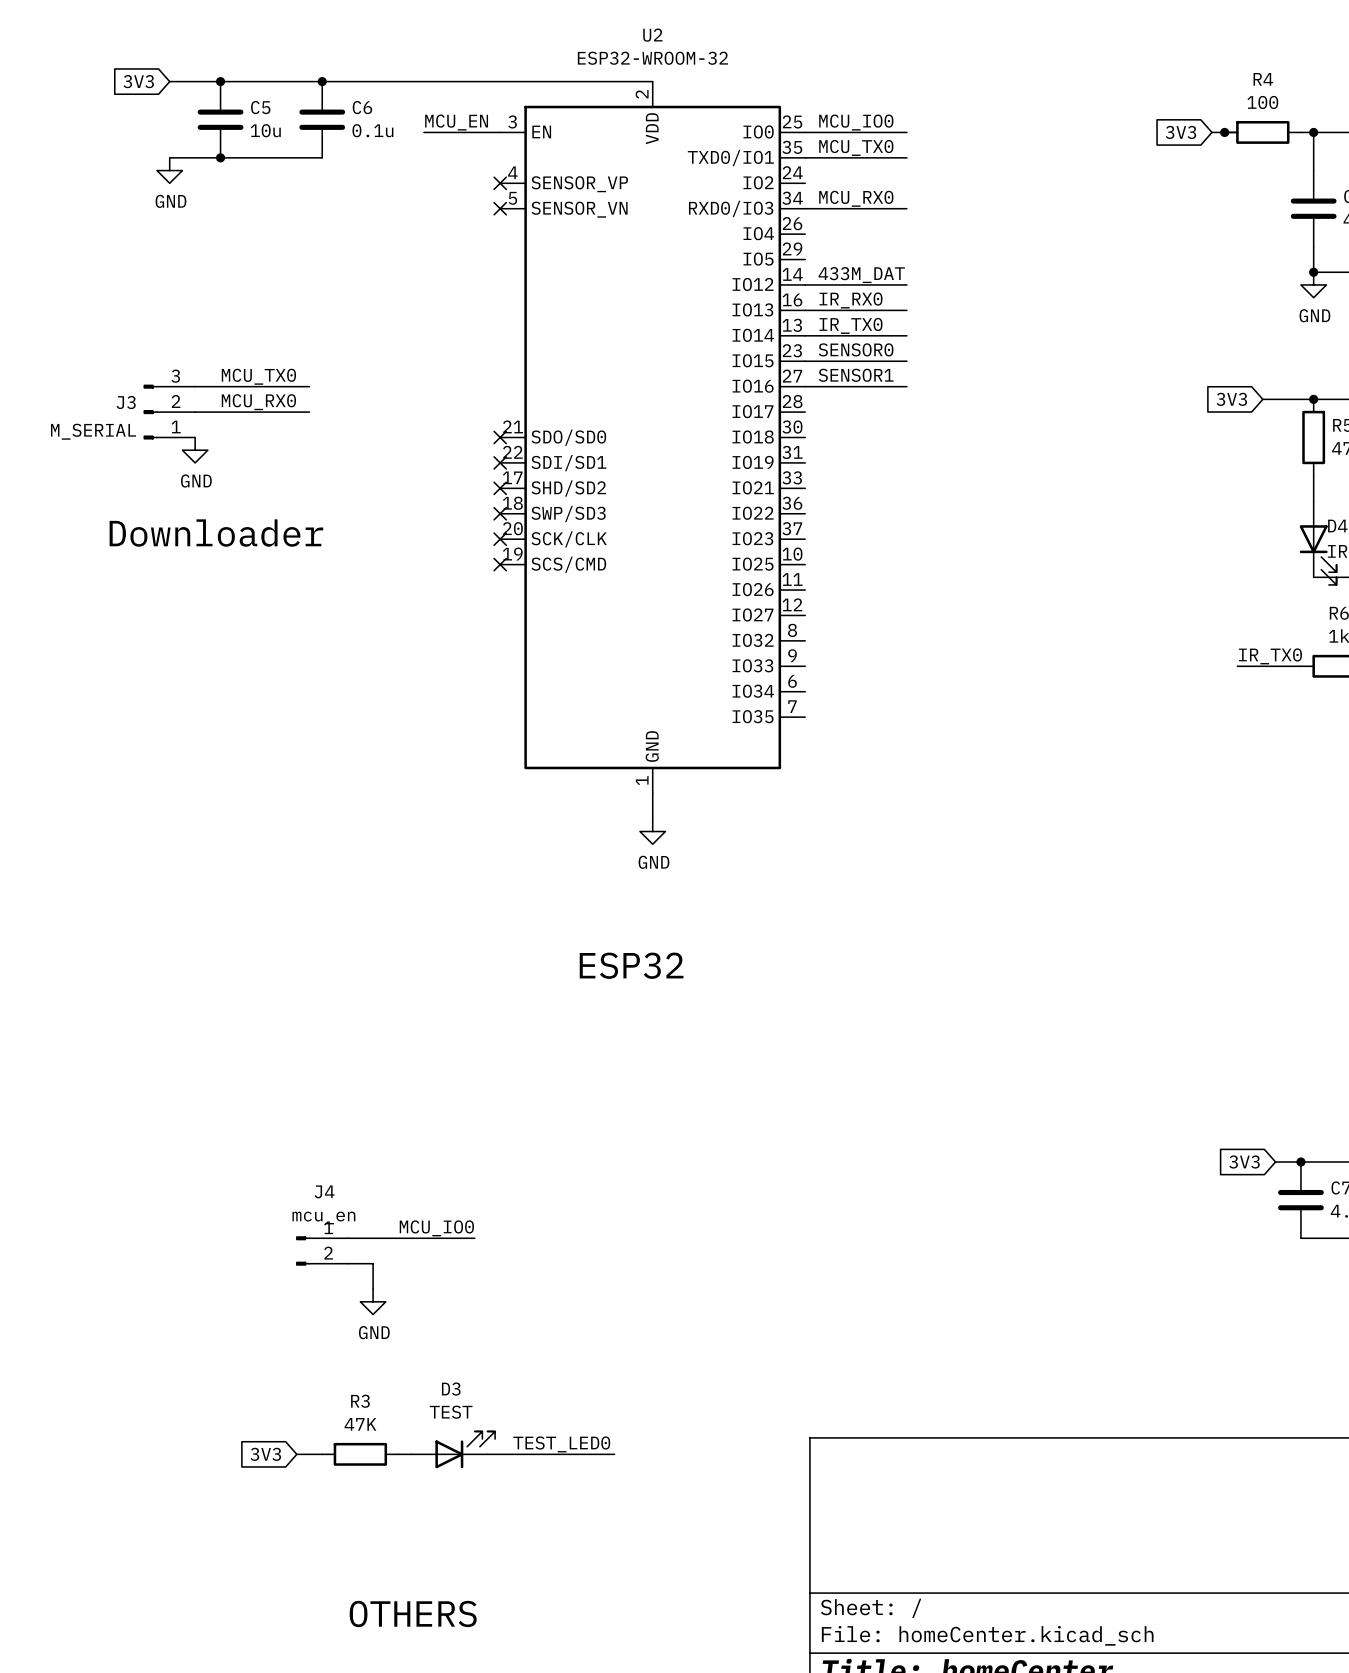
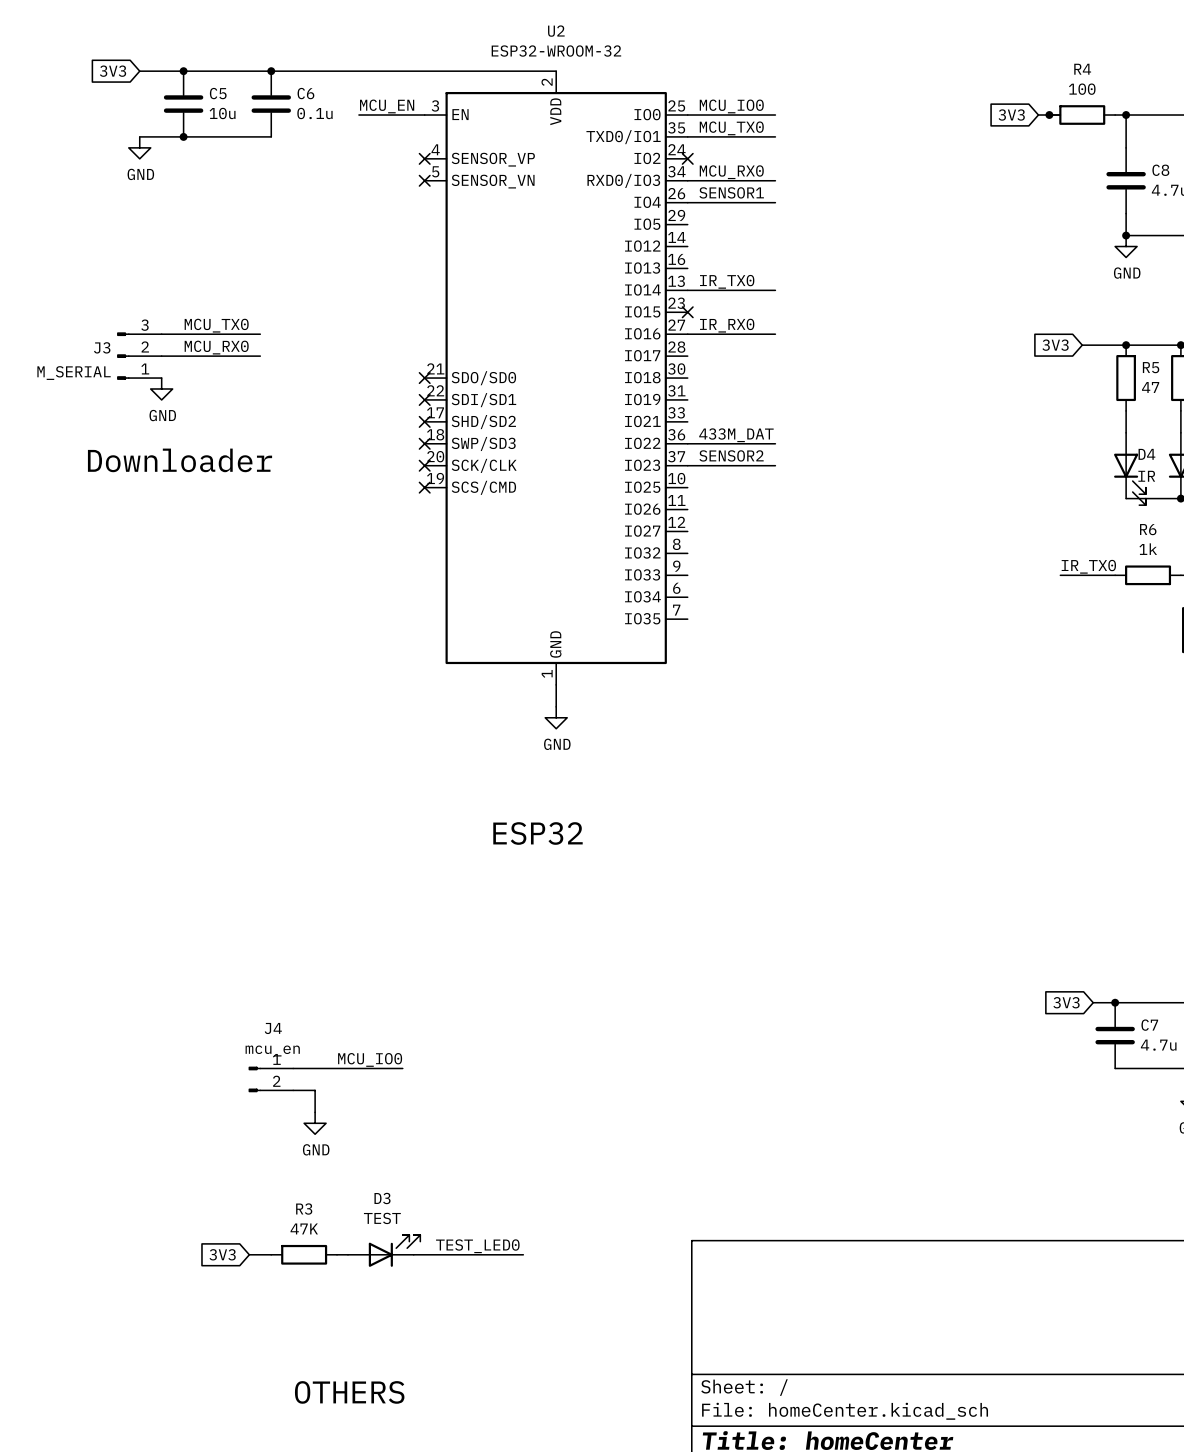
no-connect mark: none -> (687, 158)
label: none -> SENSOR1 (731, 192)
label position: 433M_DAT (861, 275) -> 433M_DAT (736, 435)
wire: (805, 284) (906, 284) -> (687, 202) (775, 202)
label: IR_RX0 (850, 300) -> none
wire: (805, 310) (906, 310) -> (687, 465) (775, 465)
label: SENSOR0 (856, 349) -> none
wire: (805, 361) (906, 361) -> (687, 443) (775, 443)
no-connect mark: none -> (687, 312)
label: SENSOR1 (856, 375) -> IR_RX0 (727, 325)
label: none -> SENSOR2 (731, 455)

